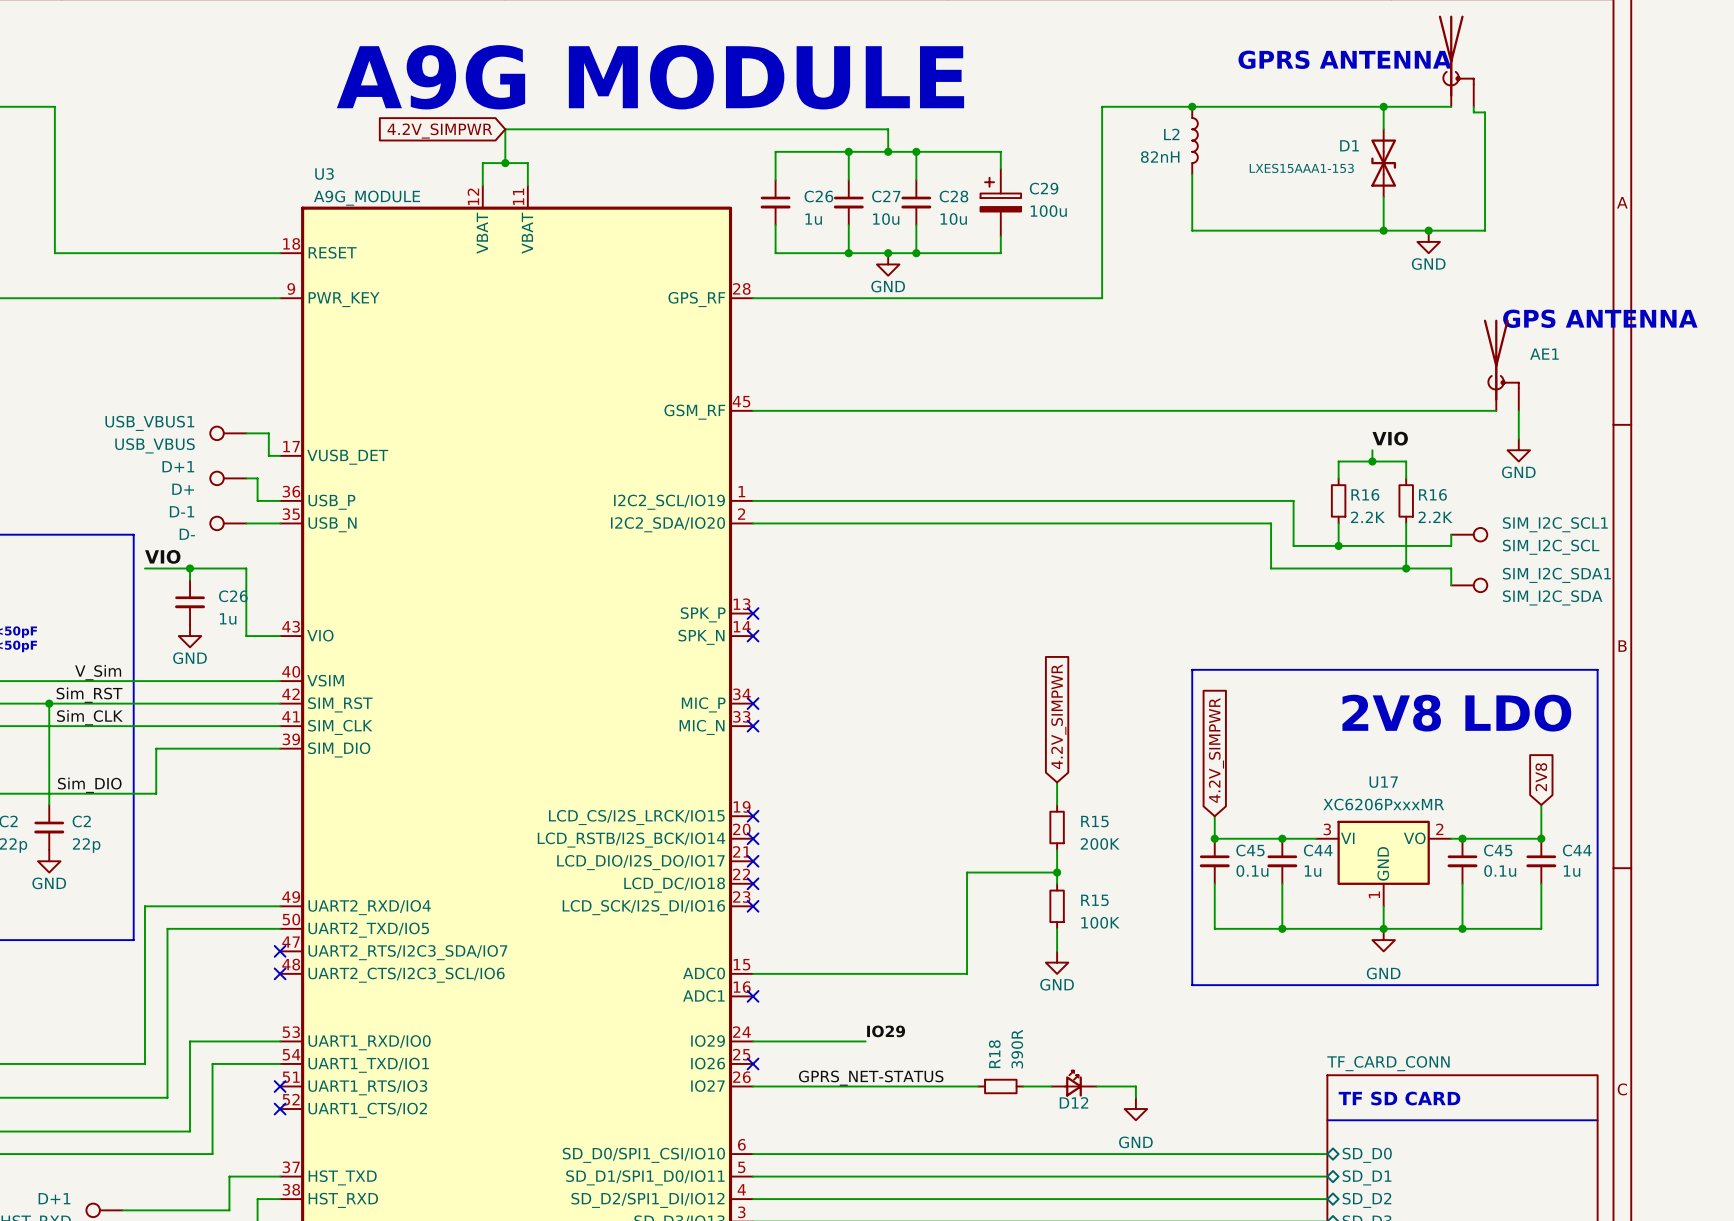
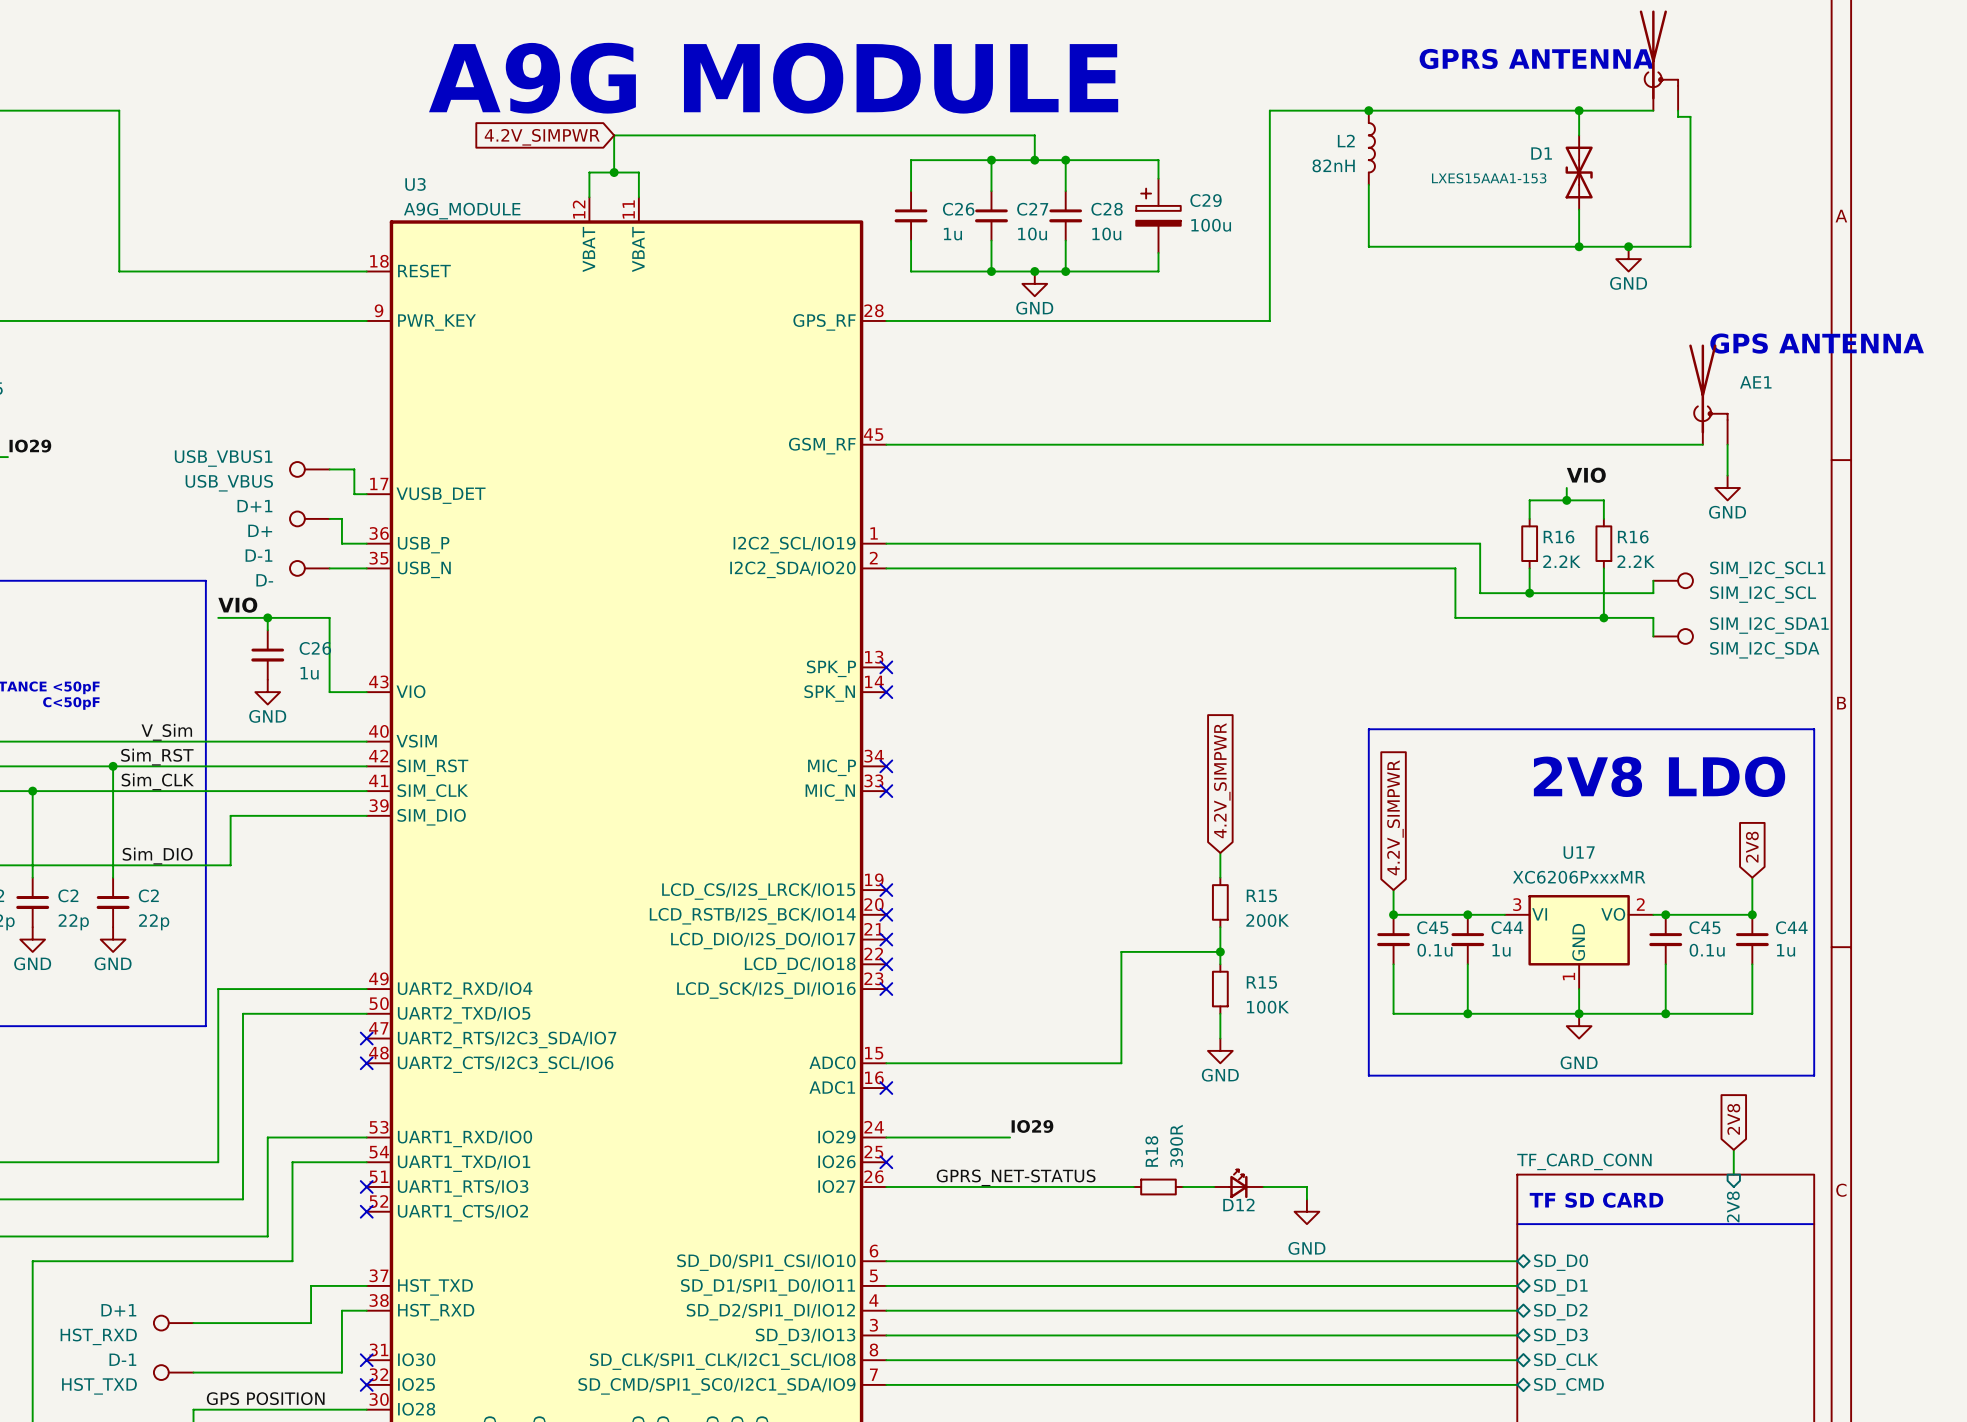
global label: none -> 2V8 (1733, 1119)
wire: none -> (1733, 1149) (1733, 1174)
sheet pin: none -> 2V8 (1733, 1206)

